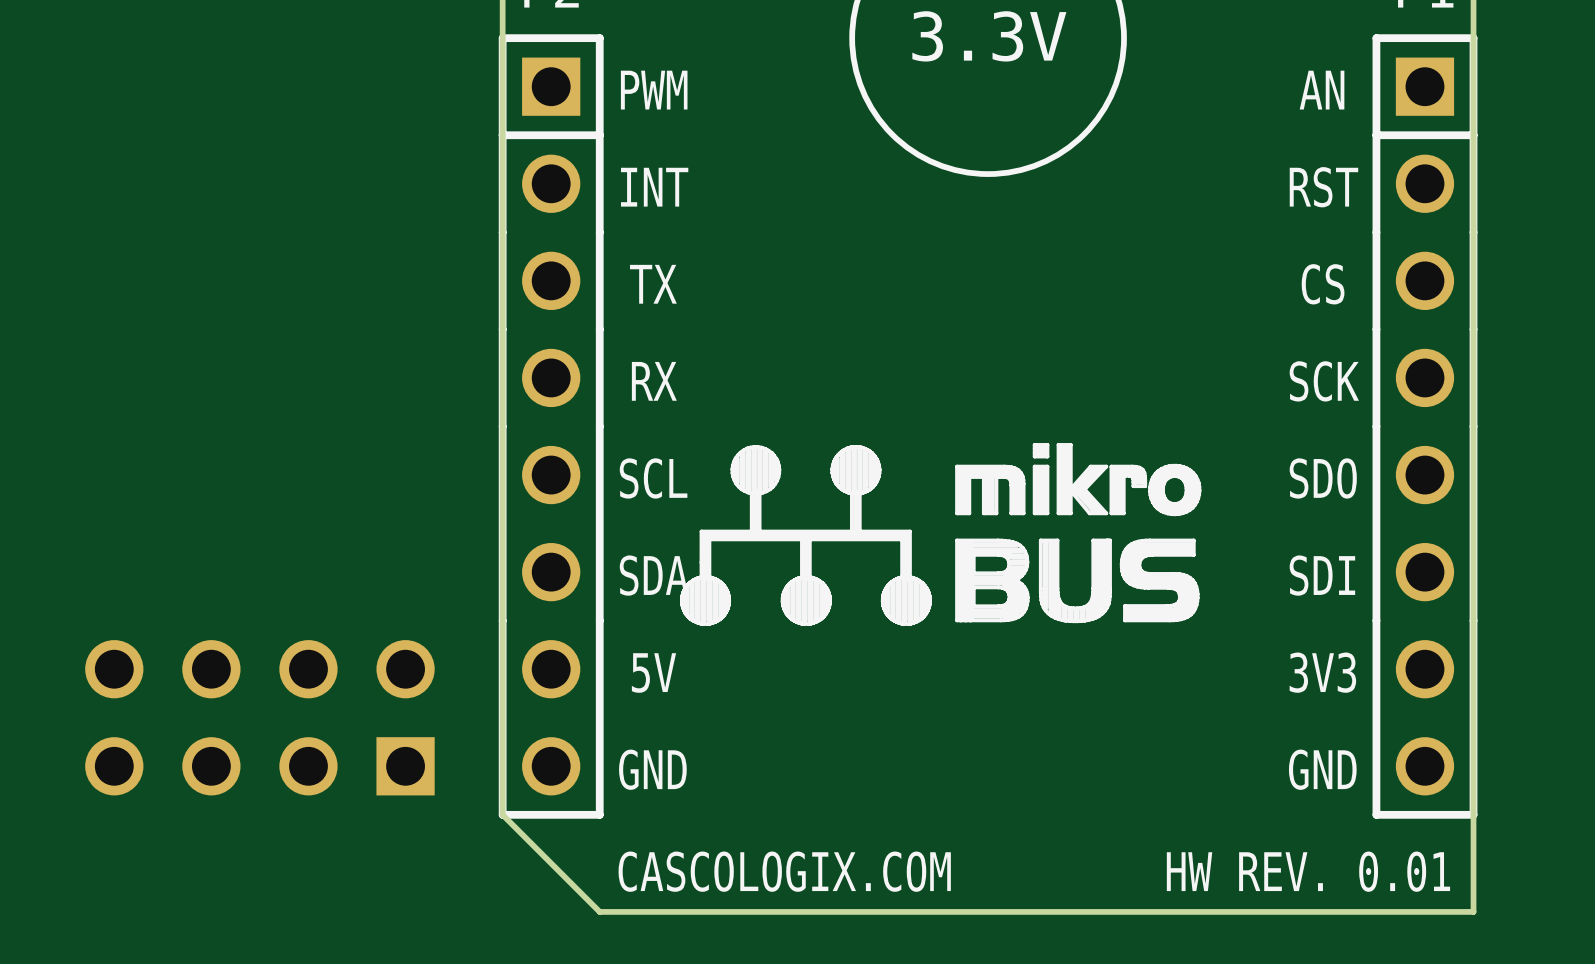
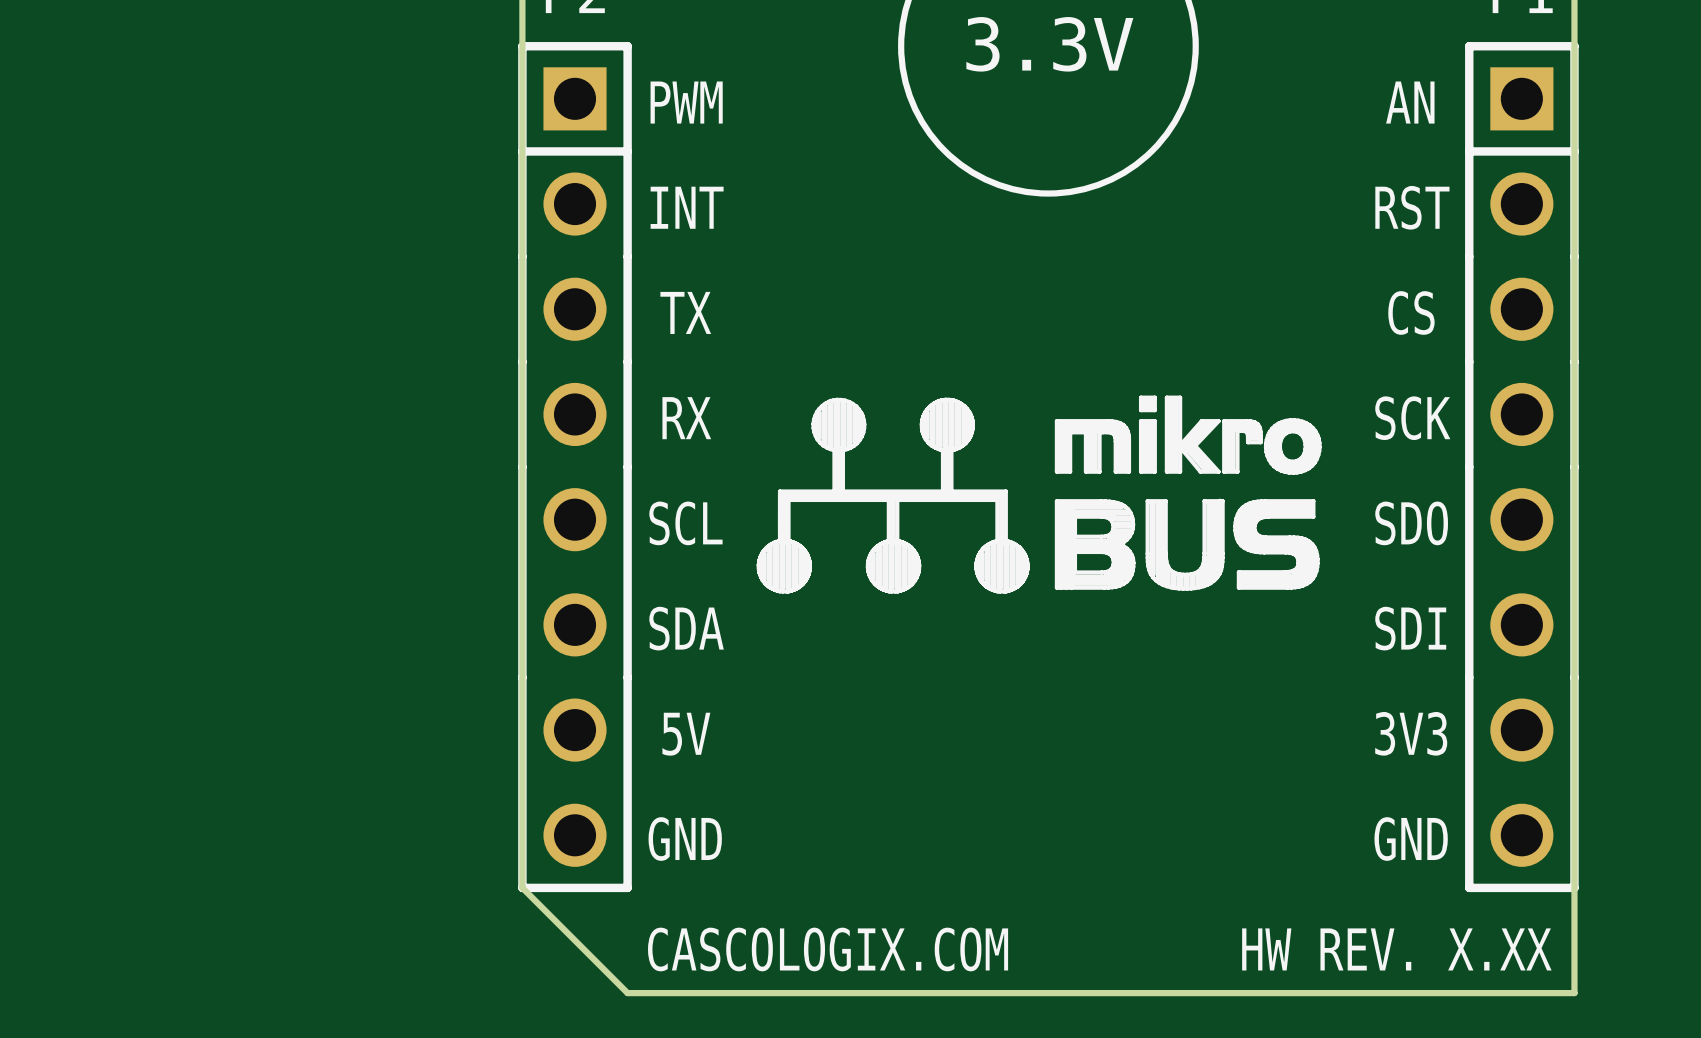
drawing position: (940, 534) -> (1039, 494)
part: (259, 717) -> none
text: HW REV. 0.01 (1308, 871) -> HW REV. X.XX (1396, 949)

